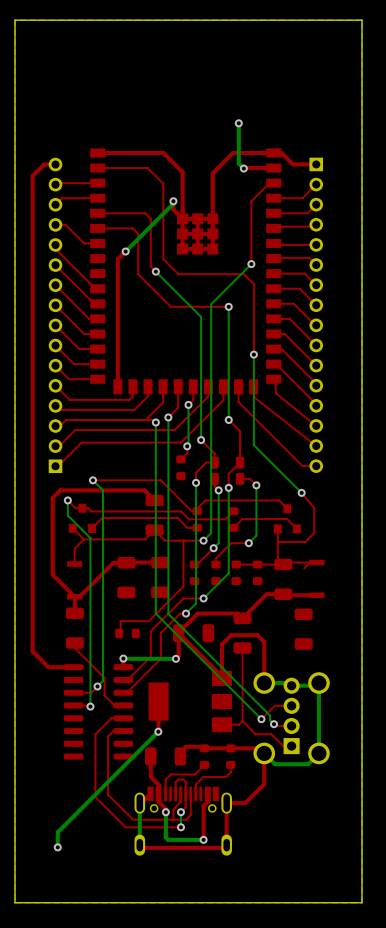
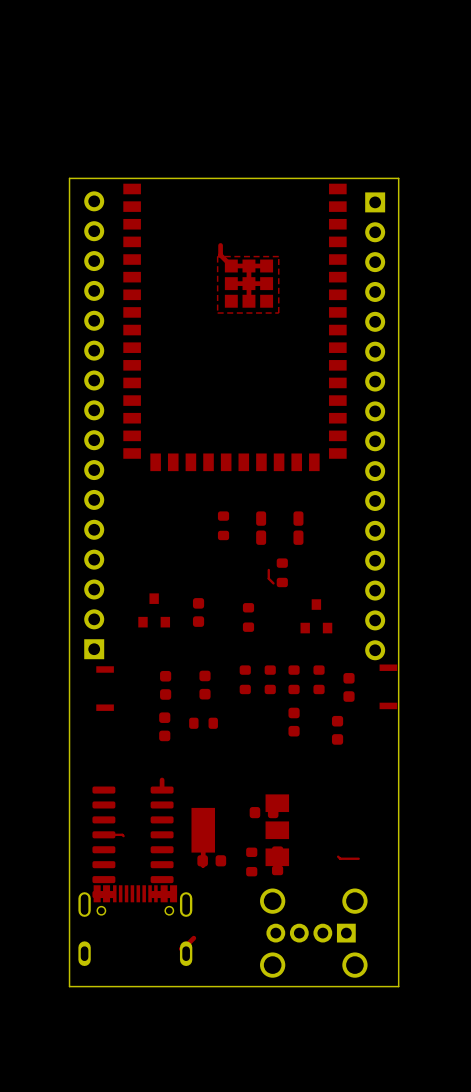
board edge: (362, 20) (15, 20) (15, 902) (362, 902) (362, 20) -> (398, 178) (398, 986) (69, 986) (69, 178) (398, 178)
bottom track: (238, 123) (238, 163) (243, 168) -> none
via: (238, 123) -> none
top track: (97, 152) (163, 152) (182, 172) (182, 249) (212, 249) (212, 173) (233, 152) (281, 152) (293, 164) (316, 164) -> none
top track: (55, 164) (44, 164) (32, 176) (32, 651) (48, 667) (73, 667) -> none
top track: (97, 168) (147, 168) (163, 183) (163, 259) (178, 274) (243, 274) (253, 284) (253, 354) -> none
via: (243, 168) -> none
top track: (273, 168) (243, 168) -> none
top track: (97, 183) (55, 184) -> none
top track: (273, 183) (269, 183) (251, 201) (251, 264) -> none
top track: (316, 184) (302, 198) (273, 198) -> none
top track: (97, 198) (62, 198) (55, 204) -> none
bottom track: (173, 201) (173, 203) (125, 251) -> none
via: (173, 201) -> none
top track: (316, 204) (307, 213) (273, 213) -> none
top zone outline: none -> (278, 256) (278, 313) (217, 313) (217, 256) (278, 256)
top track: (97, 213) (145, 213) (150, 218) (150, 266) (155, 271) -> none
top track: (55, 224) (65, 224) (84, 243) (97, 243) -> none
top track: (316, 224) (314, 226) (275, 226) (273, 228) -> none
top track: (97, 228) (132, 228) (138, 233) (138, 274) (170, 306) (228, 306) -> none
top track: (273, 243) (316, 244) -> none
top track: (55, 248) (95, 288) -> none
top track: (125, 251) (117, 259) (117, 386) -> none
via: (125, 251) -> none
top track: (273, 258) (309, 258) (316, 265) -> none
bottom track: (251, 264) (211, 304) (211, 533) (203, 540) -> none
via: (251, 264) -> none
top track: (55, 267) (55, 265) (94, 303) -> none
bottom track: (155, 271) (201, 316) (201, 440) -> none
via: (155, 271) -> none
top track: (273, 273) (304, 273) (316, 285) -> none
top track: (55, 285) (89, 318) (97, 318) -> none
top track: (273, 288) (299, 288) (316, 305) -> none
top track: (273, 303) (293, 303) (315, 325) (316, 322) -> none
top track: (55, 305) (84, 333) (97, 333) -> none
bottom track: (228, 306) (228, 419) -> none
via: (228, 306) -> none
part: (55, 315) -> none
part: (316, 315) -> none
top track: (273, 318) (289, 318) (316, 345) -> none
top track: (55, 325) (79, 349) (97, 349) -> none
top track: (273, 333) (284, 333) (316, 365) -> none
top track: (55, 345) (74, 364) (97, 364) -> none
top track: (273, 349) (281, 349) (316, 385) -> none
bottom track: (253, 354) (253, 445) (301, 492) -> none
via: (253, 354) -> none
part: none -> (94, 425)
part: none -> (375, 426)
top track: (276, 364) (316, 404) -> none
top track: (55, 365) (69, 379) (97, 379) -> none
top track: (273, 379) (275, 381) (275, 393) (316, 425) -> none
top track: (55, 385) (69, 399) (129, 399) (132, 396) (132, 386) -> none
top track: (148, 386) (148, 396) (134, 409) (59, 409) (55, 405) -> none
top track: (163, 386) (163, 402) (145, 419) -> none
top track: (178, 386) (178, 407) (168, 417) -> none
top track: (193, 386) (193, 400) (188, 404) -> none
top track: (208, 386) (208, 396) (174, 430) (75, 430) (59, 446) (55, 446) -> none
top track: (223, 386) (223, 400) (180, 442) (81, 442) (58, 466) (55, 466) -> none
top track: (238, 386) (238, 402) (302, 466) (316, 466) -> none
top track: (253, 386) (254, 397) (316, 446) -> none
bottom track: (188, 404) (187, 446) -> none
via: (188, 404) -> none
bottom track: (168, 417) (168, 613) (269, 715) (269, 720) (274, 724) -> none
via: (168, 417) -> none
top track: (228, 419) (240, 431) (240, 462) (228, 473) (228, 487) -> none
via: (228, 419) -> none
top track: (155, 422) (153, 419) (66, 419) (60, 426) (55, 426) -> none
bottom track: (155, 422) (155, 613) (261, 719) -> none
via: (155, 422) -> none
top track: (201, 440) (214, 453) (214, 462) (206, 462) (196, 472) (196, 482) -> none
via: (201, 440) -> none
part: none -> (223, 525)
part: none -> (261, 528)
part: none -> (298, 528)
top track: (187, 446) (187, 453) (180, 459) -> none
via: (187, 446) -> none
part: (180, 467) -> none
part: (214, 470) -> none
part: (240, 470) -> none
top track: (240, 478) (249, 478) (256, 485) -> none
top track: (92, 480) (160, 480) (191, 511) (197, 511) (197, 508) (205, 500) (279, 500) (287, 508) -> none
bottom track: (92, 480) (103, 490) (103, 680) (97, 686) -> none
via: (92, 480) -> none
part: none -> (282, 572)
bottom track: (196, 482) (196, 603) (186, 613) -> none
via: (196, 482) -> none
bottom track: (256, 485) (256, 535) (248, 543) -> none
via: (256, 485) -> none
bottom track: (228, 487) (228, 573) (203, 598) -> none
via: (228, 487) -> none
bottom track: (218, 490) (218, 543) (213, 548) -> none
via: (218, 490) -> none
top track: (301, 492) (314, 507) (314, 533) (305, 541) (277, 541) -> none
via: (301, 492) -> none
part footprint: [145, 494, 164, 536] -> [192, 598, 205, 627]
top track: (67, 500) (75, 508) (87, 507) (91, 511) (181, 511) (189, 519) (225, 519) (233, 511) -> none
bottom track: (67, 500) (67, 515) (90, 538) (90, 706) -> none
via: (67, 500) -> none
top track: (154, 500) (144, 490) (60, 490) (52, 497) (52, 574) (74, 596) (74, 613) -> none
part position: (82, 518) -> (154, 610)
part position: (287, 518) -> (316, 616)
part: (233, 519) -> none
top track: (197, 527) (187, 527) (177, 518) (102, 518) (91, 528) -> none
top track: (233, 527) (242, 519) (287, 519) (296, 528) -> none
top track: (72, 528) (83, 539) -> none
top track: (277, 528) (277, 559) (283, 564) -> none
top track: (83, 539) (145, 539) (154, 530) (165, 540) (203, 540) -> none
top track: (83, 539) (74, 548) (74, 564) -> none
top track: (183, 540) (183, 586) (148, 621) (120, 621) (119, 633) -> none
via: (203, 540) -> none
top track: (248, 543) (231, 543) (215, 558) (215, 564) -> none
via: (248, 543) -> none
top track: (213, 548) (197, 564) (194, 564) -> none
via: (213, 548) -> none
part footprint: [151, 556, 170, 598] -> [199, 670, 211, 700]
part footprint: [117, 557, 136, 599] -> [160, 670, 172, 700]
part footprint: [274, 558, 293, 601] -> [343, 673, 355, 702]
top track: (160, 562) (113, 562) (79, 596) (74, 596) -> none
top track: (309, 562) (304, 568) -> none
top track: (316, 562) (285, 562) (283, 564) -> none
top track: (283, 564) (236, 564) -> none
top track: (316, 595) (266, 594) (242, 618) (237, 613) (197, 613) (178, 632) (178, 656) (175, 658) -> none
top track: (203, 598) (183, 598) (150, 631) (150, 656) (127, 679) (123, 679) -> none
via: (203, 598) -> none
part: none -> (294, 722)
part: none -> (164, 726)
top track: (186, 613) (180, 613) (160, 633) (160, 658) (126, 692) (123, 692) -> none
via: (186, 613) -> none
part: none -> (337, 730)
part: (74, 628) -> none
part: (303, 629) -> none
part position: (127, 633) -> (203, 723)
top track: (178, 633) (221, 676) -> none
part: (193, 633) -> none
part: (242, 633) -> none
top track: (74, 642) (74, 648) (104, 677) (104, 695) (114, 705) (123, 705) -> none
top track: (242, 648) (242, 721) -> none
bottom track: (123, 658) (175, 658) -> none
via: (123, 658) -> none
via: (175, 658) -> none
top track: (221, 678) (221, 644) (231, 635) (257, 635) (264, 642) (264, 683) -> none
bottom track: (264, 683) (288, 683) (291, 685) (316, 685) (318, 683) (318, 753) (308, 764) (275, 764) (264, 753) -> none
top track: (97, 686) (91, 692) (73, 692) -> none
via: (97, 686) -> none
part: none -> (264, 812)
top track: (291, 705) (274, 705) (261, 719) -> none
via: (90, 706) -> none
top track: (123, 718) (111, 718) (95, 734) (95, 797) (125, 827) (180, 827) -> none
part rotation: 0° (291, 718) -> 90° counterclockwise (313, 933)
part position: (291, 718) -> (313, 933)
via: (261, 719) -> none
top track: (242, 721) (239, 724) (221, 724) -> none
top track: (242, 721) (255, 734) (271, 734) (283, 746) (291, 746) -> none
via: (274, 724) -> none
part: none -> (211, 860)
part: none -> (277, 860)
part: none -> (251, 861)
top track: (123, 731) (113, 731) (108, 736) (108, 794) (133, 819) (186, 819) (190, 814) (190, 793) -> none
bottom track: (158, 731) (57, 832) (57, 847) -> none
via: (158, 731) -> none
top track: (150, 756) (150, 777) (158, 784) (158, 801) (165, 808) (165, 812) -> none
part: (165, 756) -> none
top track: (180, 756) (180, 752) (186, 746) (259, 748) (264, 753) (264, 784) (245, 803) (226, 803) (226, 845) (223, 847) (142, 847) (139, 845) -> none
part: (204, 756) -> none
part: (230, 756) -> none
top track: (204, 764) (195, 774) (170, 774) (165, 779) (165, 793) -> none
top track: (230, 764) (230, 772) (226, 777) (203, 777) (195, 784) (195, 793) -> none
top track: (175, 793) (175, 782) (178, 779) (183, 779) (185, 781) (185, 807) (180, 812) -> none
top track: (180, 793) (180, 802) (173, 809) (173, 819) -> none
top track: (207, 793) (207, 801) (203, 805) (203, 839) -> none
bottom track: (139, 803) (139, 845) -> none
bottom track: (165, 812) (165, 837) (168, 839) (203, 839) -> none
via: (165, 812) -> none
bottom track: (180, 812) (180, 827) -> none
via: (180, 812) -> none
part position: (183, 821) -> (135, 925)
via: (180, 827) -> none
via: (203, 839) -> none
via: (57, 847) -> none

